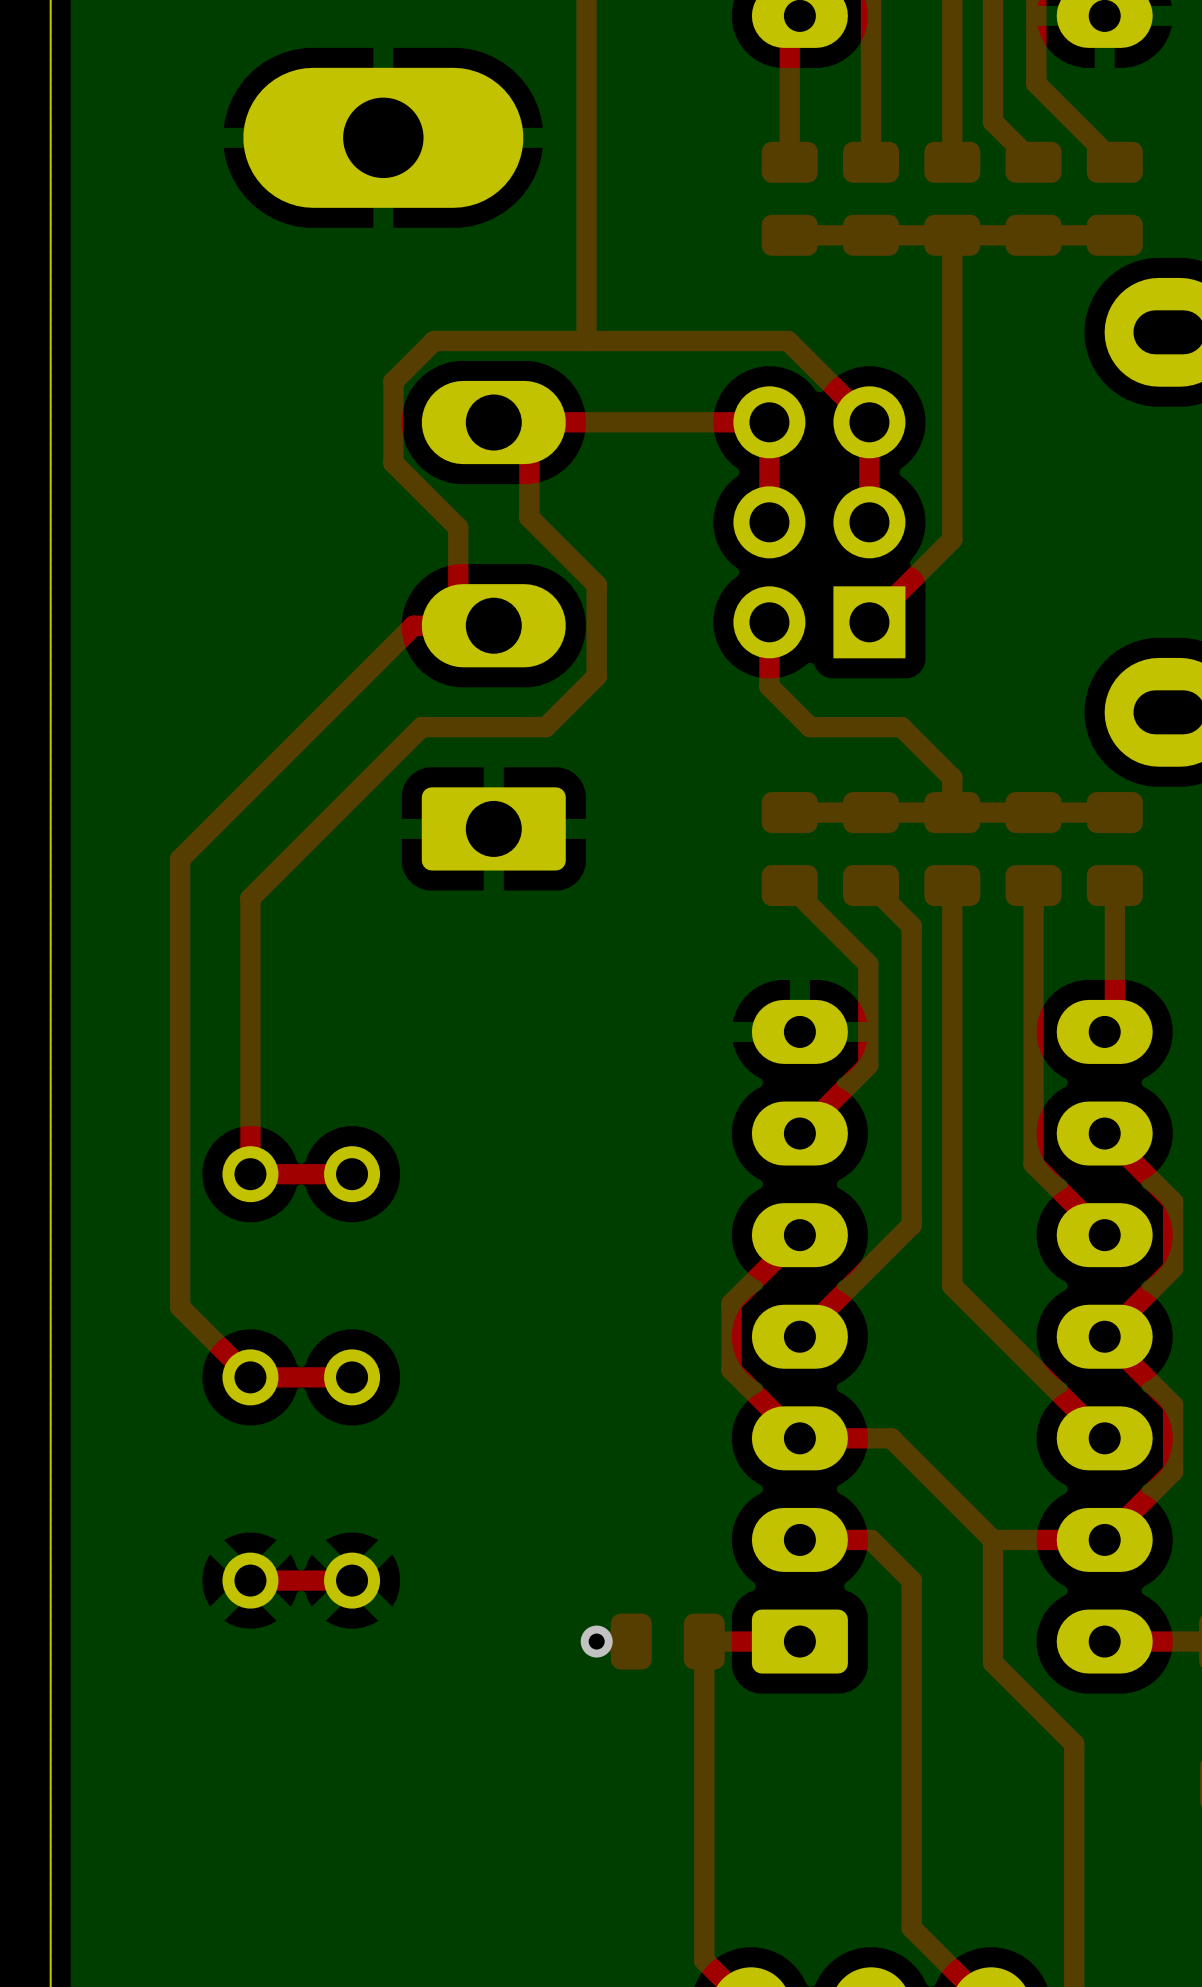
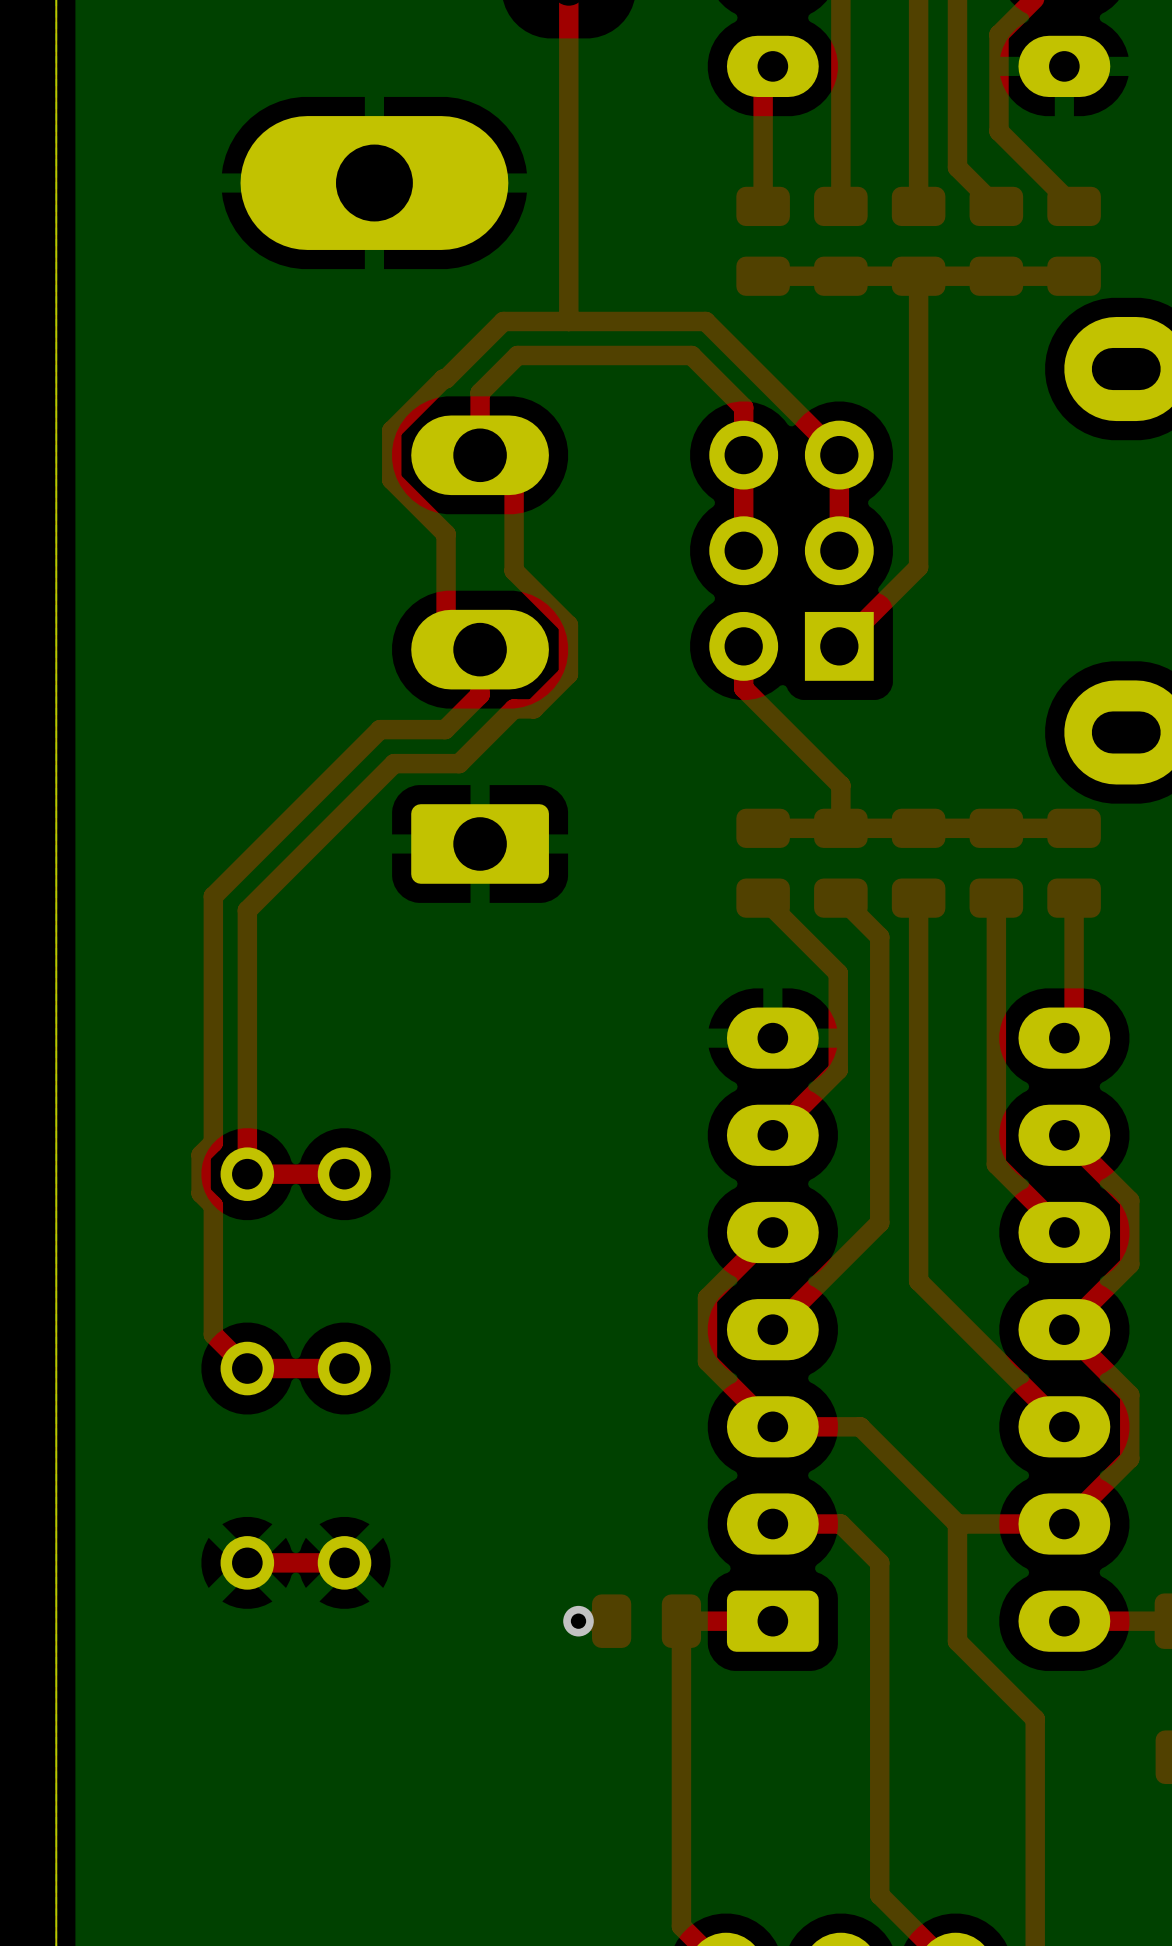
top track: (586, 282) (586, 341) -> none
top track: (788, 341) (434, 341) (393, 381) (393, 462) (458, 527) -> (761, 377) (705, 321) (503, 321) (391, 430) (391, 479) (446, 534) (446, 555)
top track: (769, 422) (493, 422) -> (743, 455) (743, 407) (691, 355) (517, 355) (480, 392) (480, 455)
top track: (529, 517) (596, 584) (596, 676) (545, 727) (421, 727) (403, 744) -> (514, 546) (514, 570) (568, 625) (568, 674) (533, 708) (513, 708) (459, 763) (394, 763)
top track: (493, 625) (413, 625) (180, 859) (180, 1307) (214, 1341) -> (480, 649) (480, 694) (445, 729) (380, 729) (213, 896) (213, 1142) (201, 1155) (201, 1193) (213, 1205) (213, 1334)
top track: (769, 666) (769, 686) (810, 727) (901, 727) (952, 777) (952, 812) -> (743, 688) (840, 785) (840, 828)

